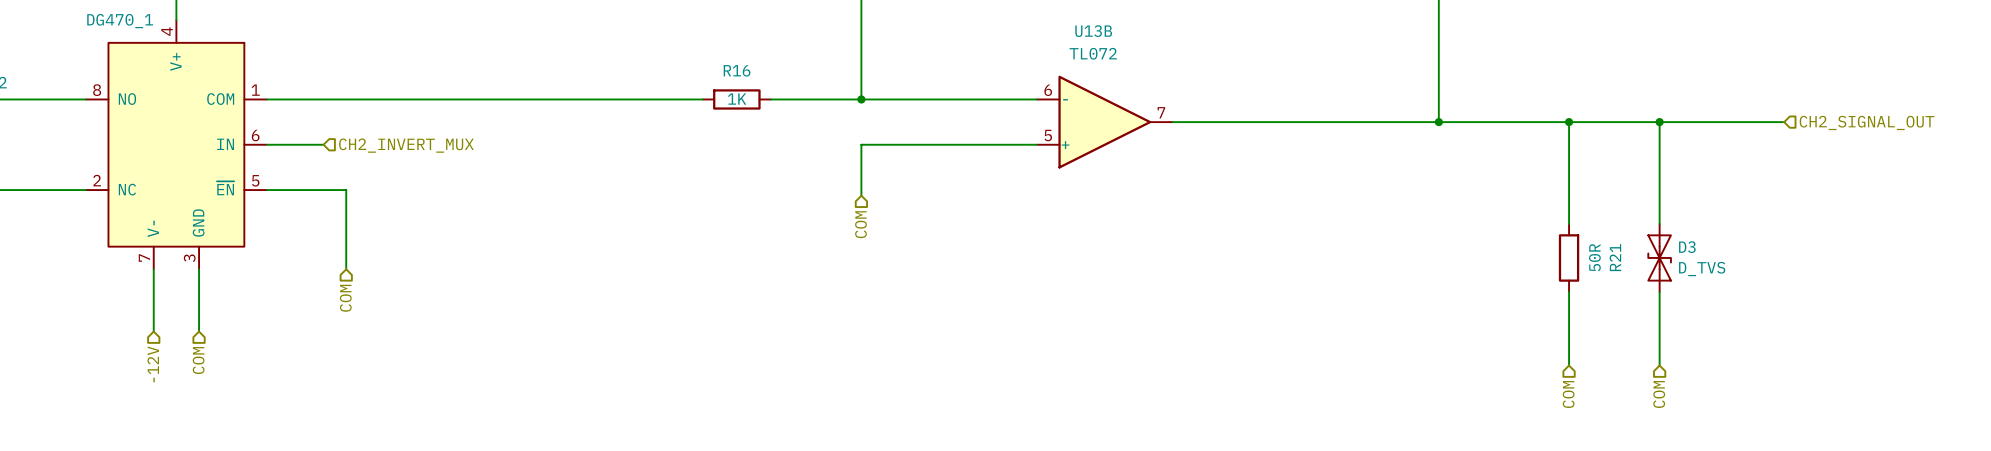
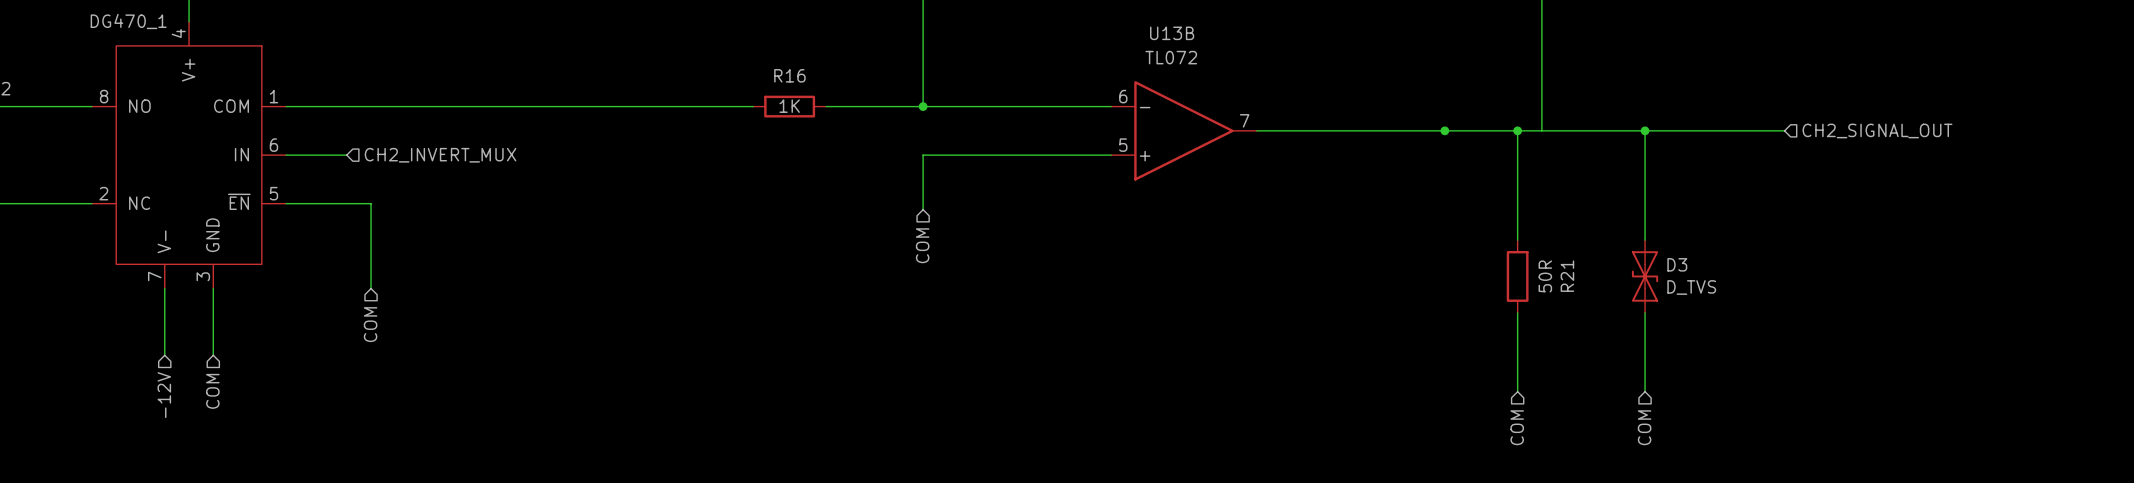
junction: none -> (1444, 130)
wire: none -> (1517, 130) (1517, 240)
junction position: (1438, 122) -> (1517, 130)
wire: (1569, 122) (1569, 224) -> (1645, 130) (1645, 240)
junction position: (1569, 122) -> (1645, 130)
wire: (1659, 122) (1659, 224) -> none
junction: (1659, 122) -> none
wire: (1665, 122) (1784, 122) -> none
hierarchical label position: CH2_SIGNAL_OUT (1867, 122) -> CH2_SIGNAL_OUT (1877, 130)
R21 position: (1569, 257) -> (1517, 276)
D3 position: (1659, 257) -> (1645, 276)
wire: none -> (1517, 312) (1517, 391)
wire: (1569, 291) (1569, 365) -> (1645, 312) (1645, 391)
wire: (1659, 291) (1659, 365) -> none
hierarchical label: none -> COM (1517, 427)
hierarchical label position: COM (1568, 394) -> COM (1644, 427)
hierarchical label: COM (1659, 394) -> none

